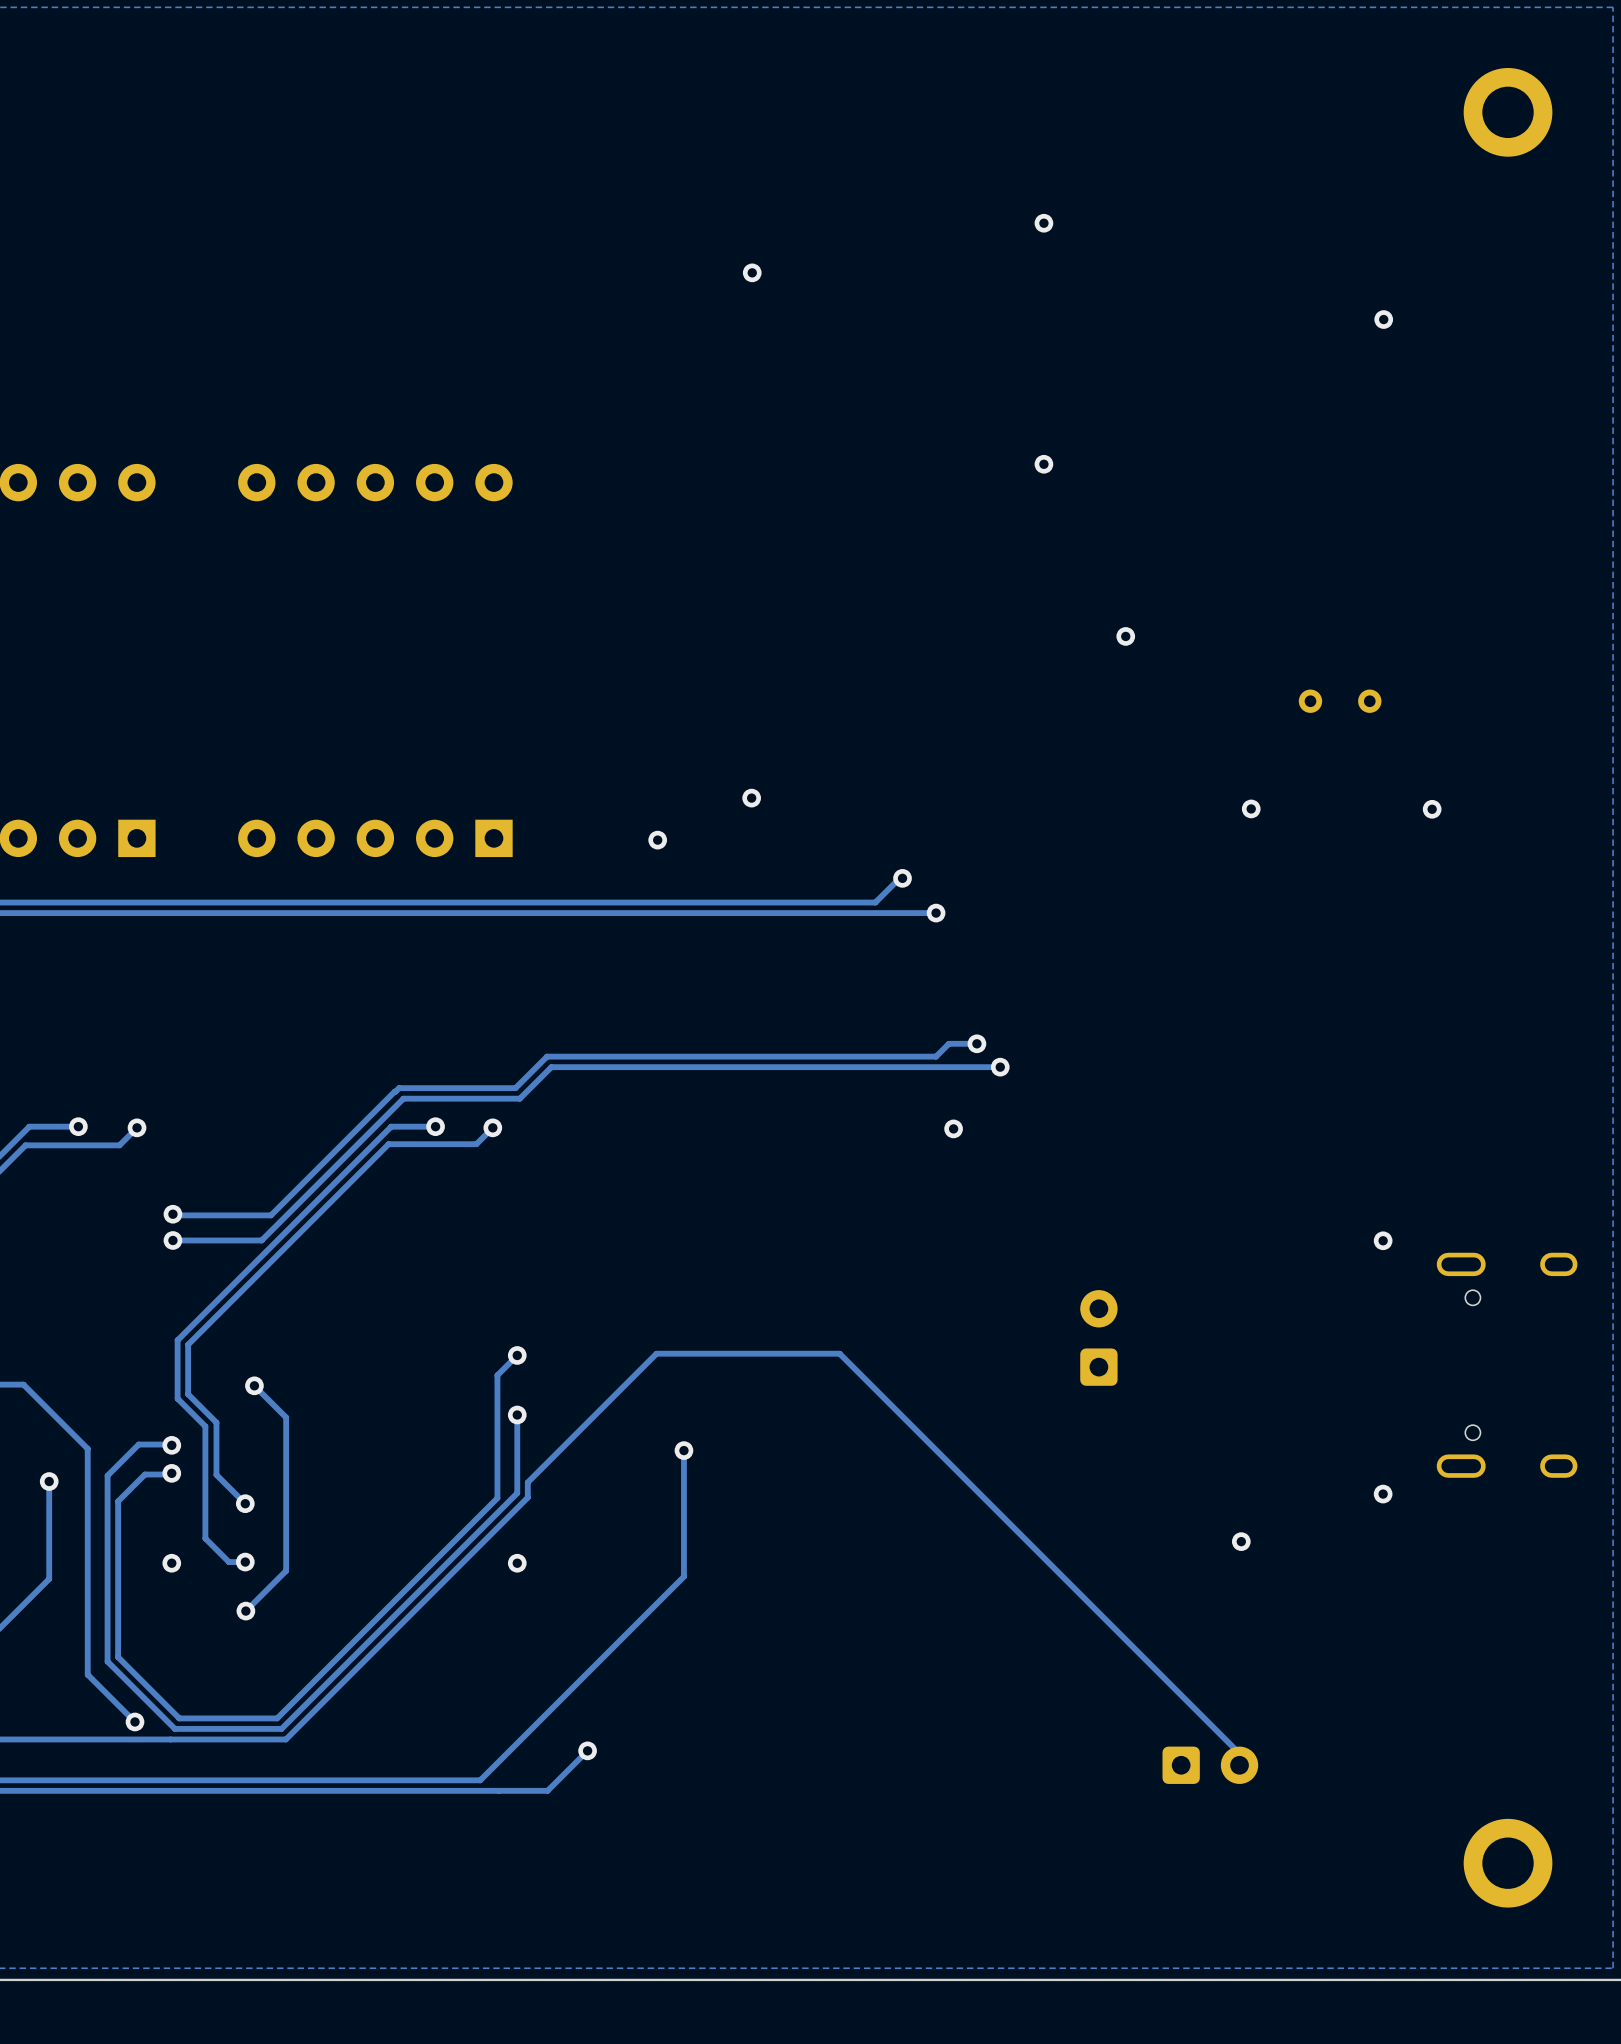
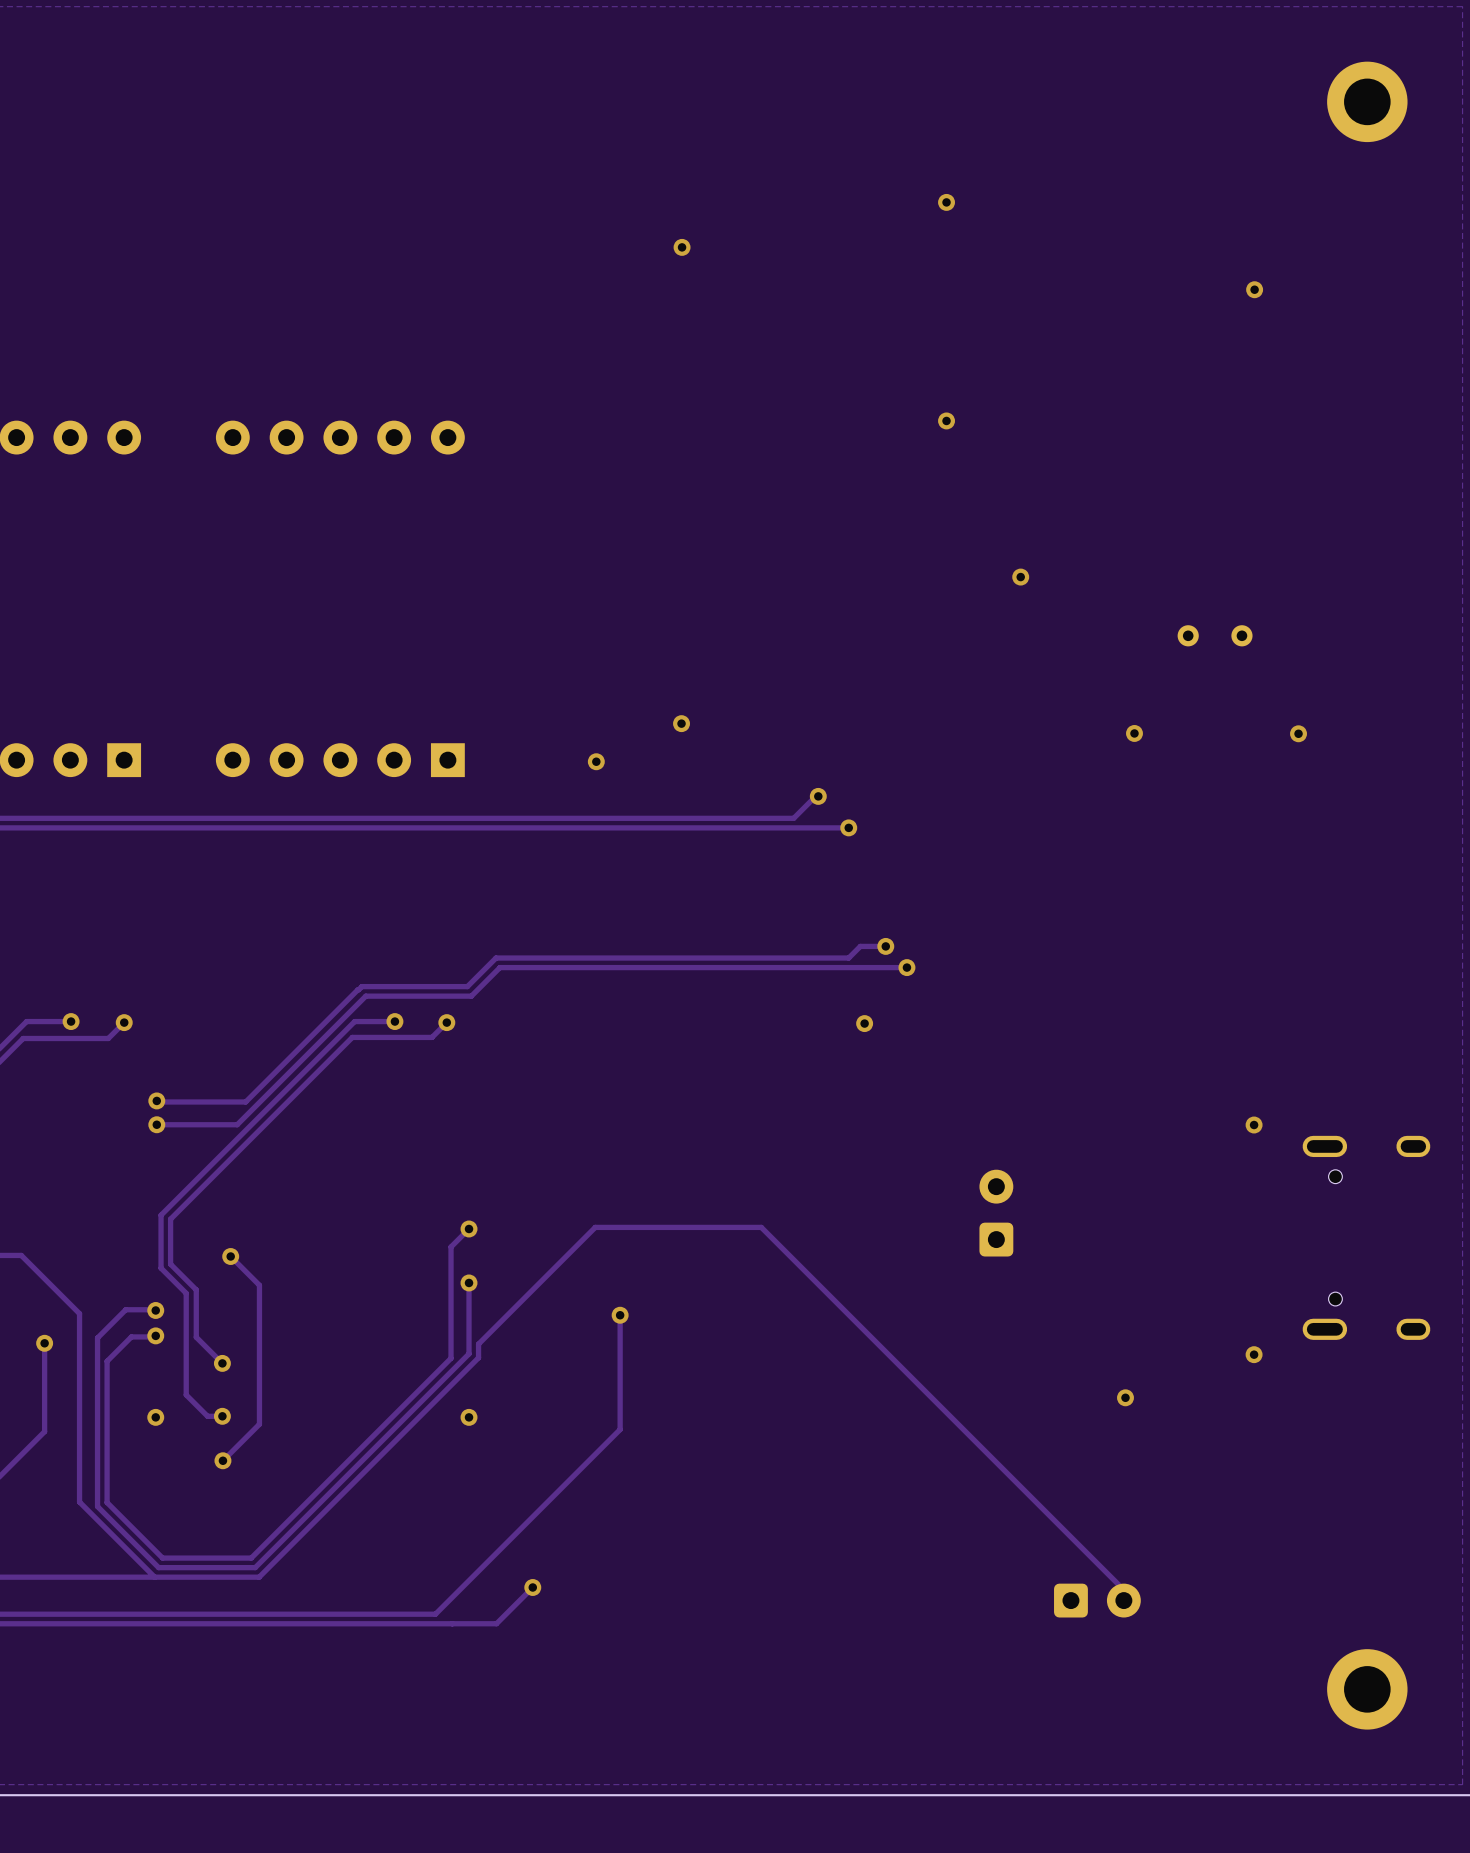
track: (87, 1656) (87, 1674) (135, 1721) -> (79, 1502) (154, 1577)
via: (135, 1721) -> none

